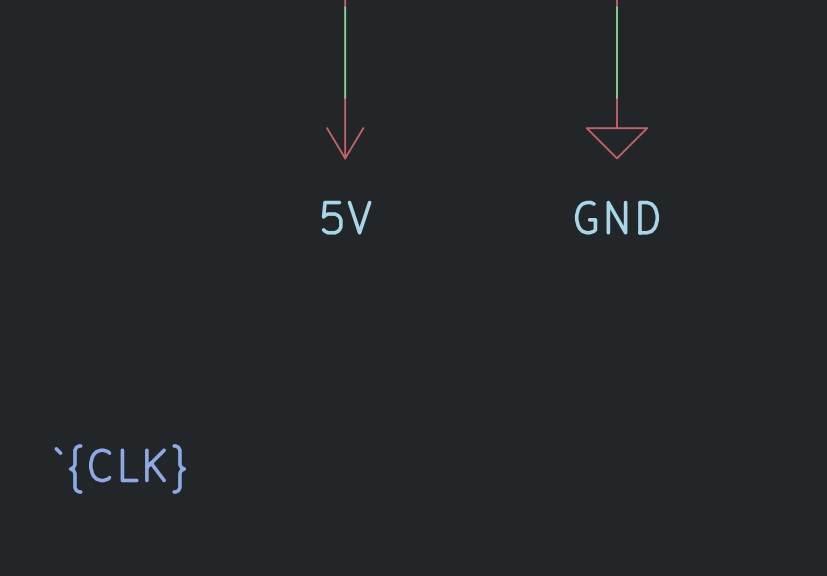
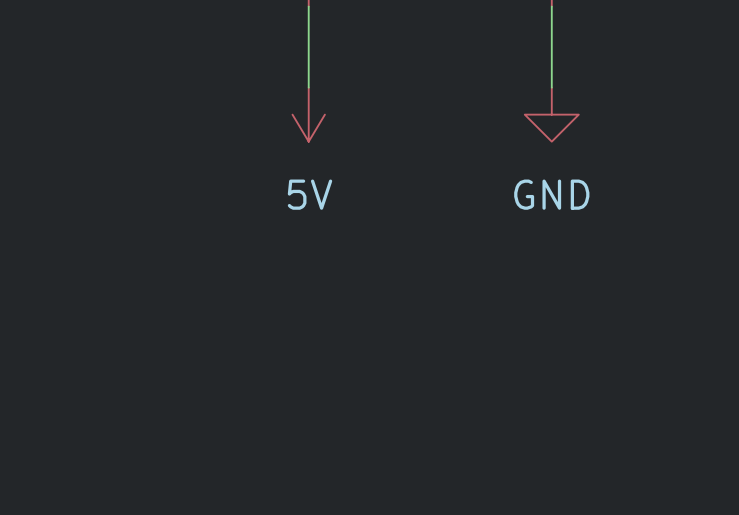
text: `{CLK} (120, 468) -> none

